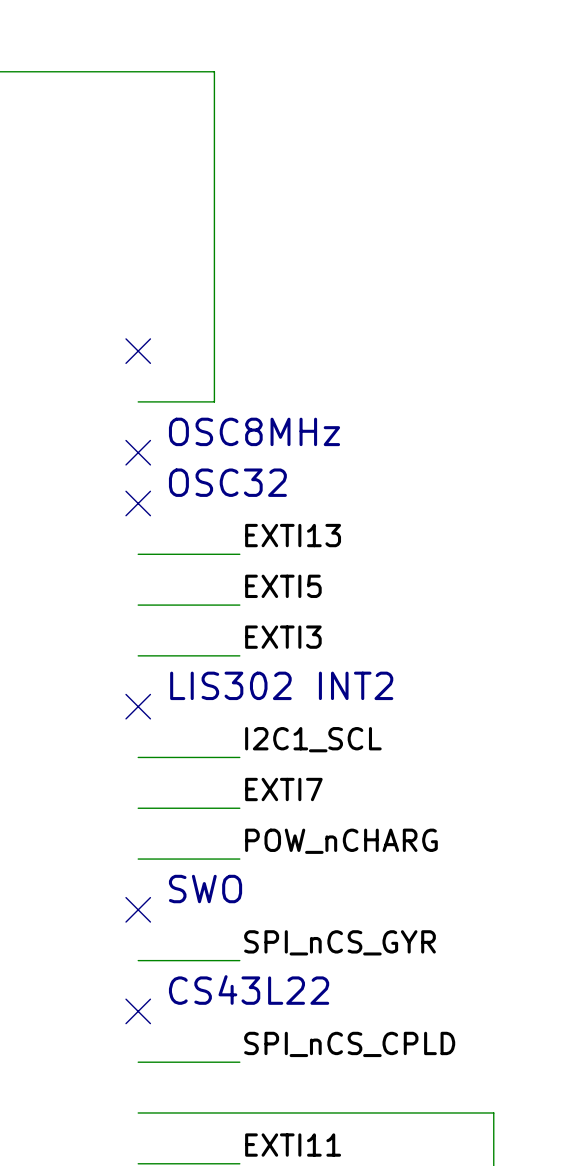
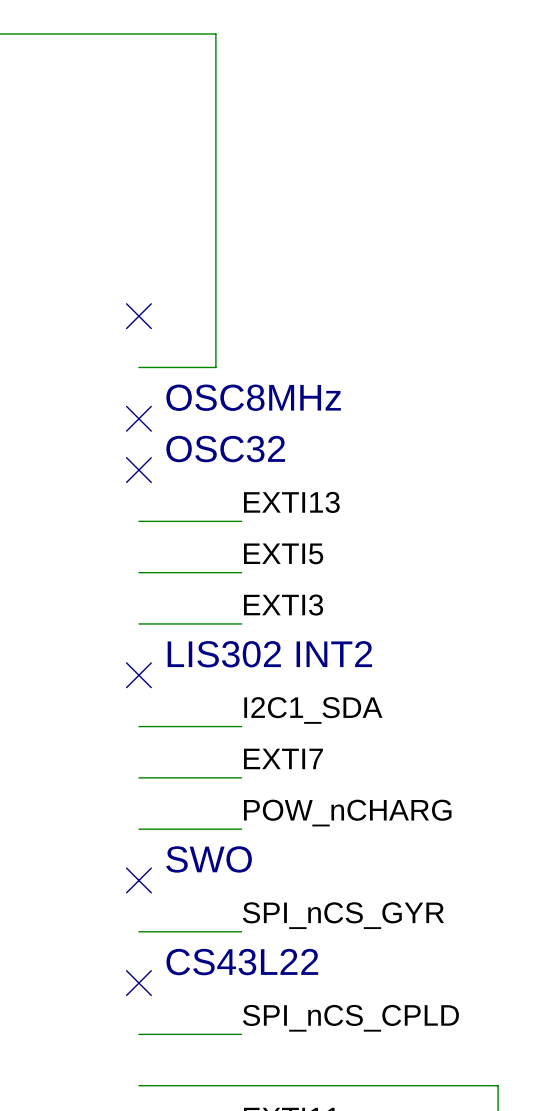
label: I2C1_SCL (313, 739) -> I2C1_SDA (313, 710)

